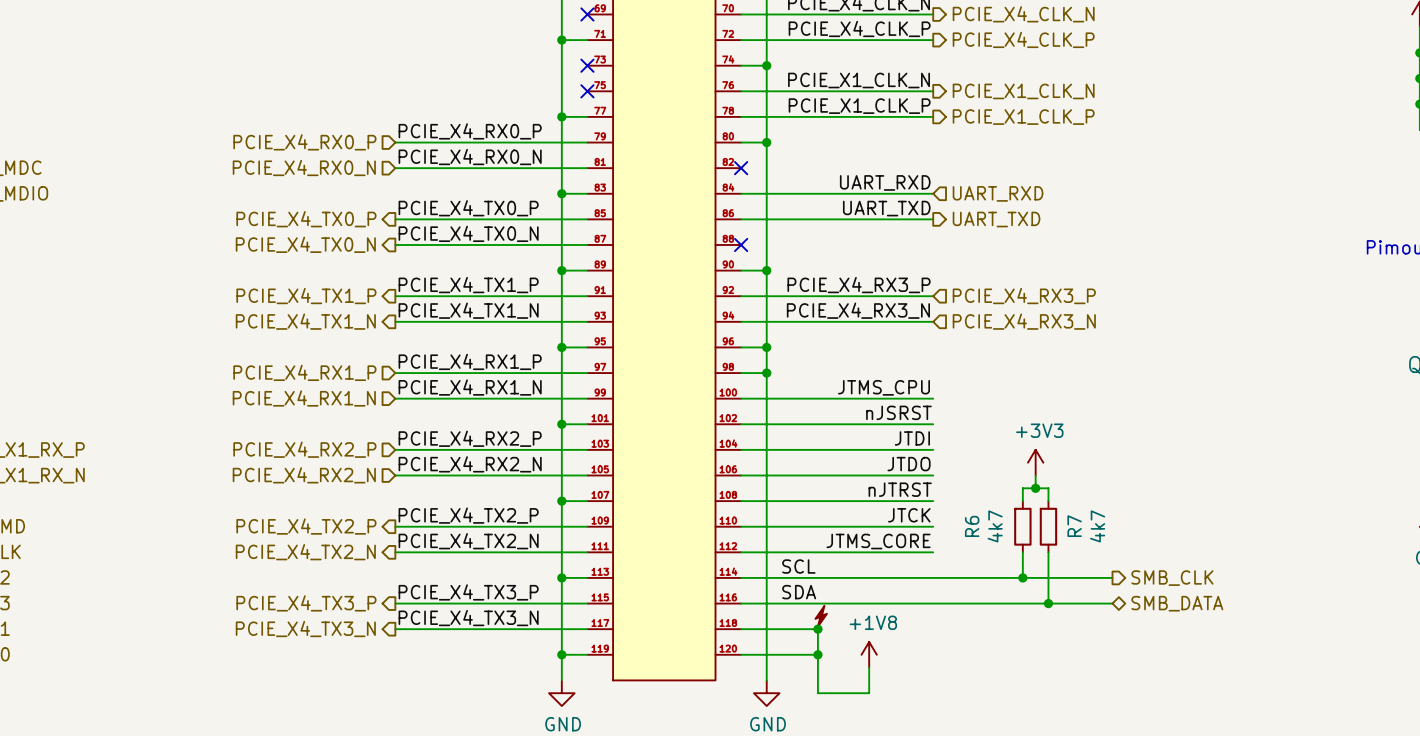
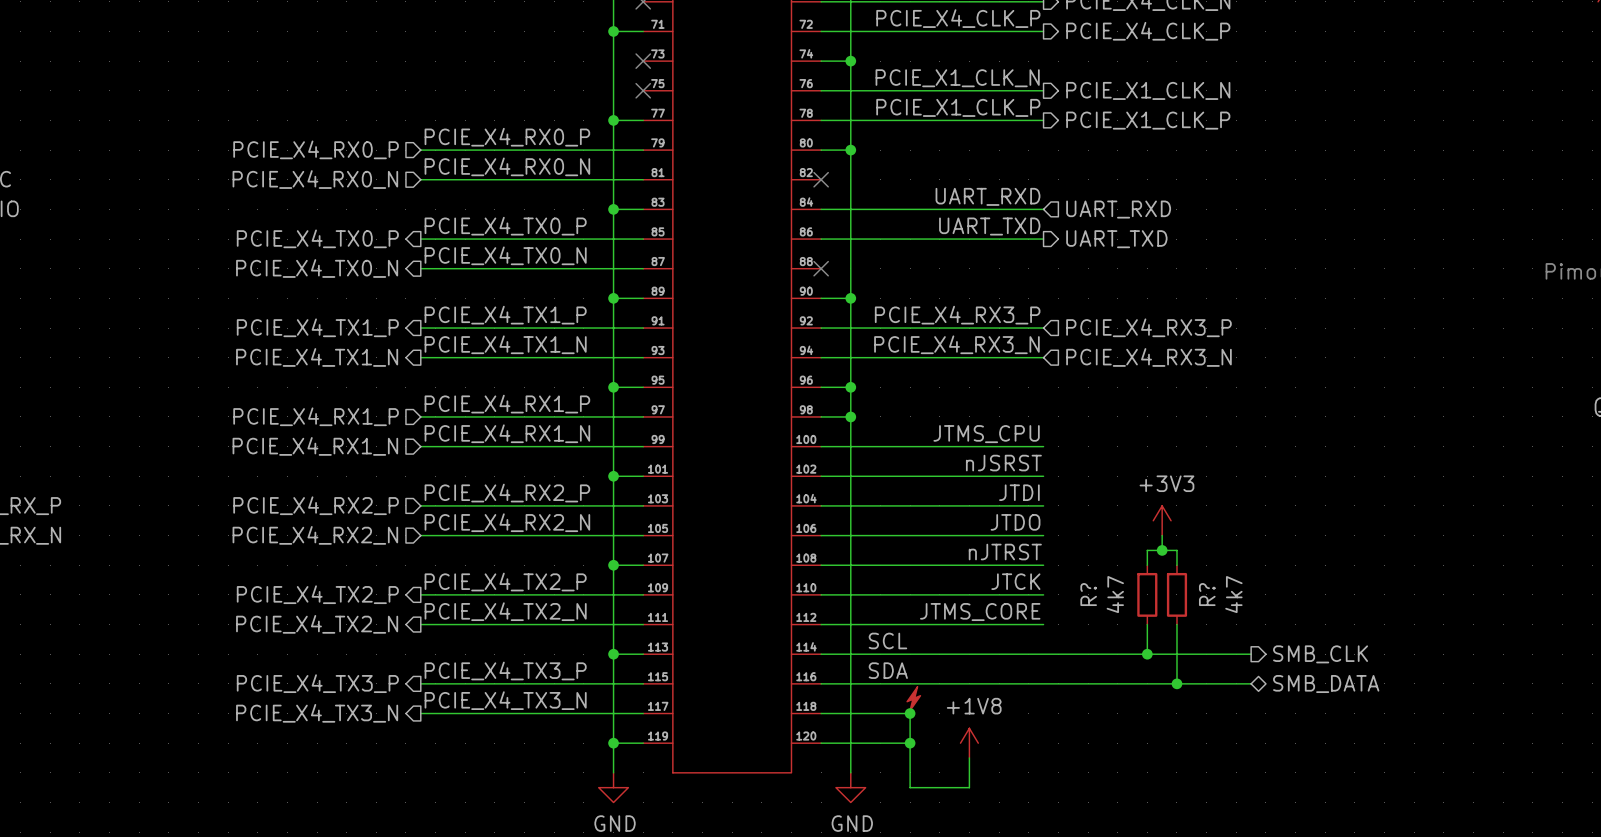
R6 name: R6 (972, 526) -> R? (1088, 594)
R7 name: R7 (1074, 526) -> R? (1207, 594)

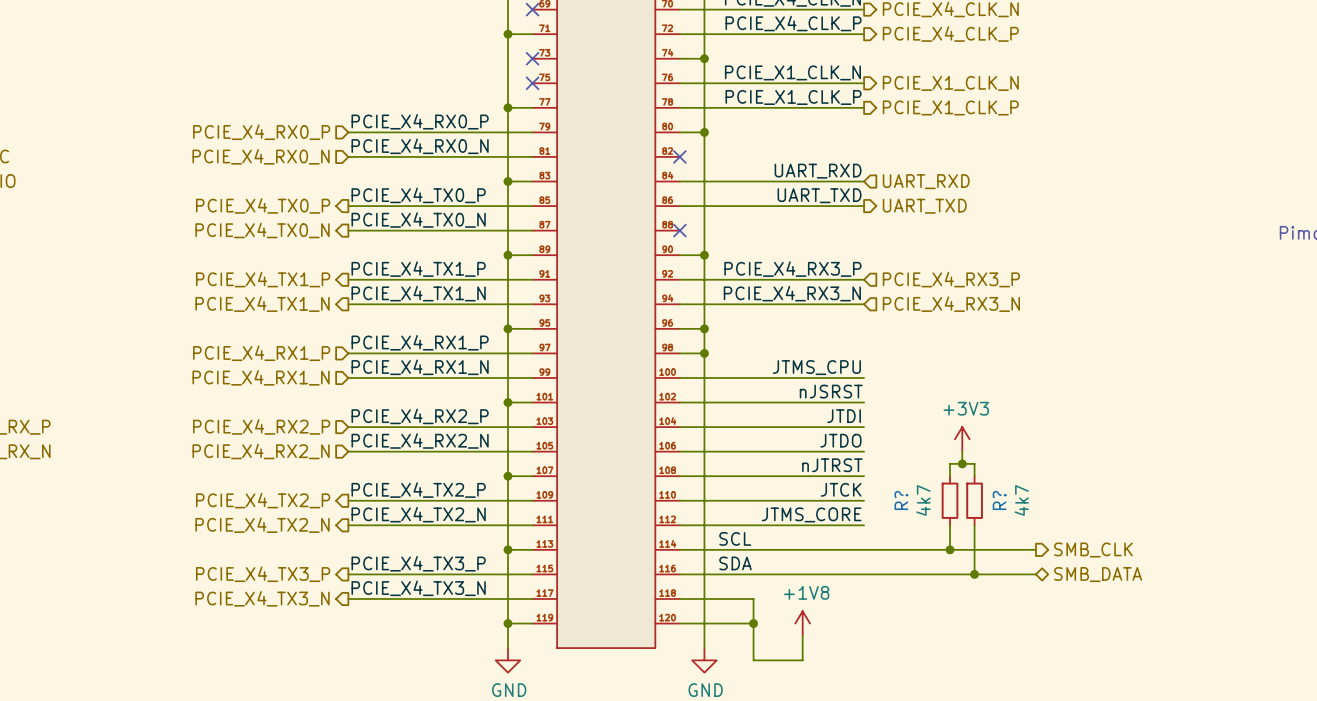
power symbol: (913, 698) -> none
junction: (910, 713) -> none

